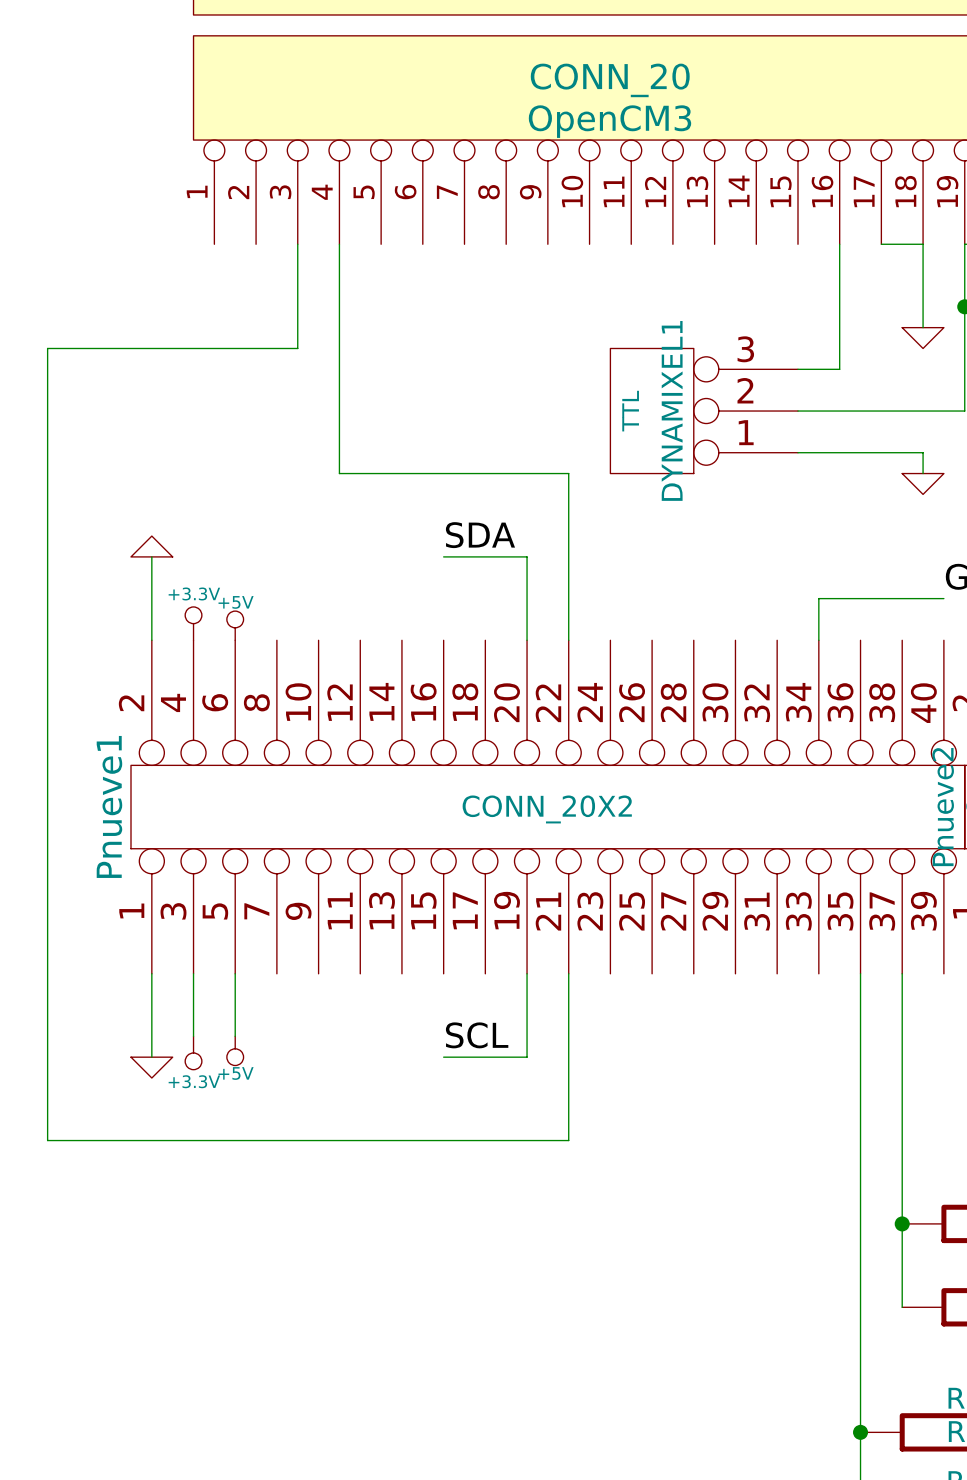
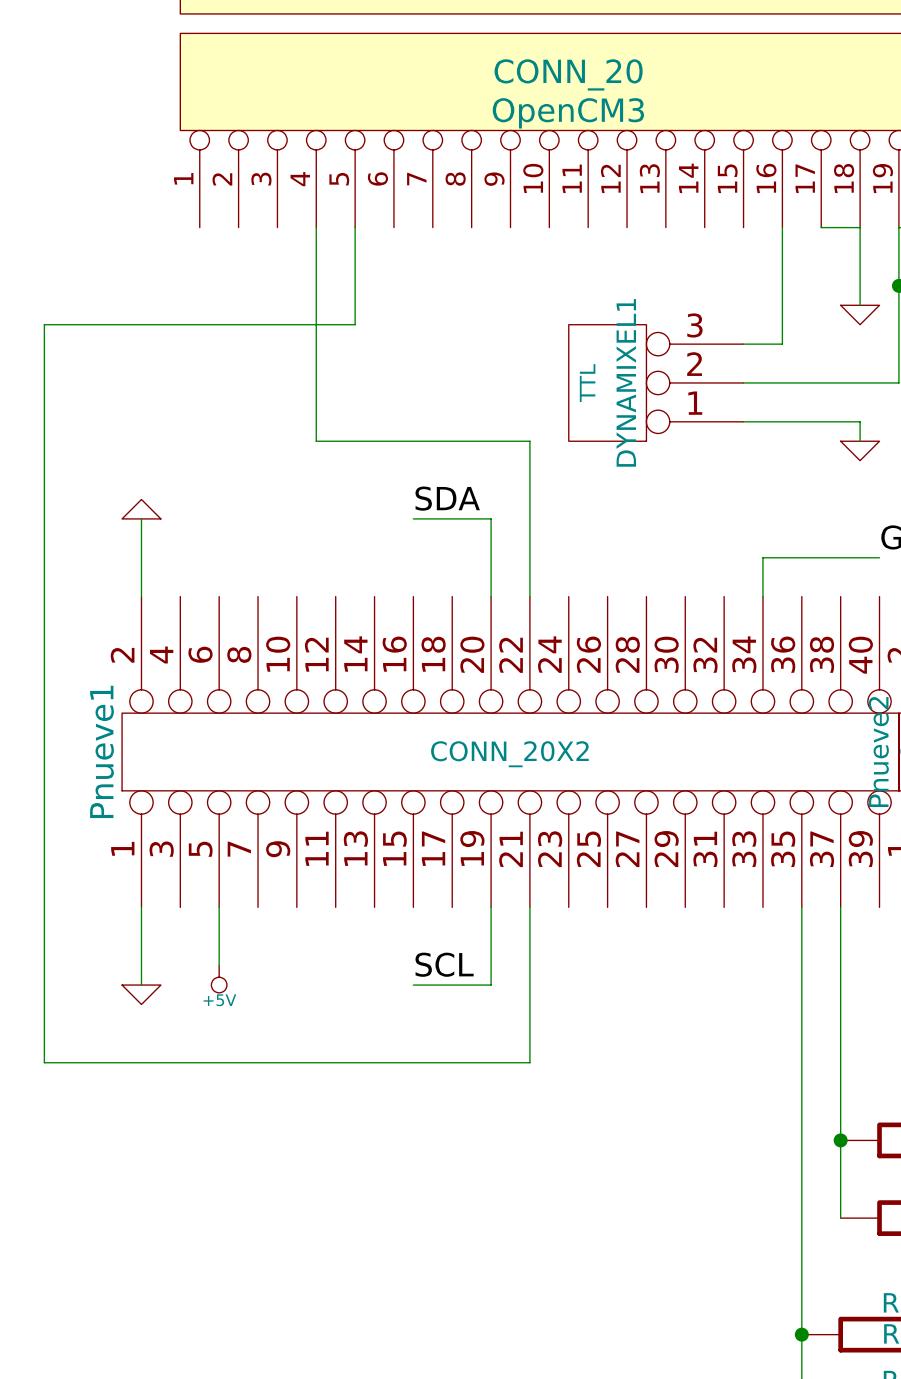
wire: (297, 244) (297, 348) -> (355, 227) (355, 324) (277, 324)
power symbol: +3.3V (193, 623) -> none
power symbol: +5V (235, 625) -> none
wire: (193, 973) (193, 1036) -> none
power symbol: +3.3V (193, 1053) -> none

